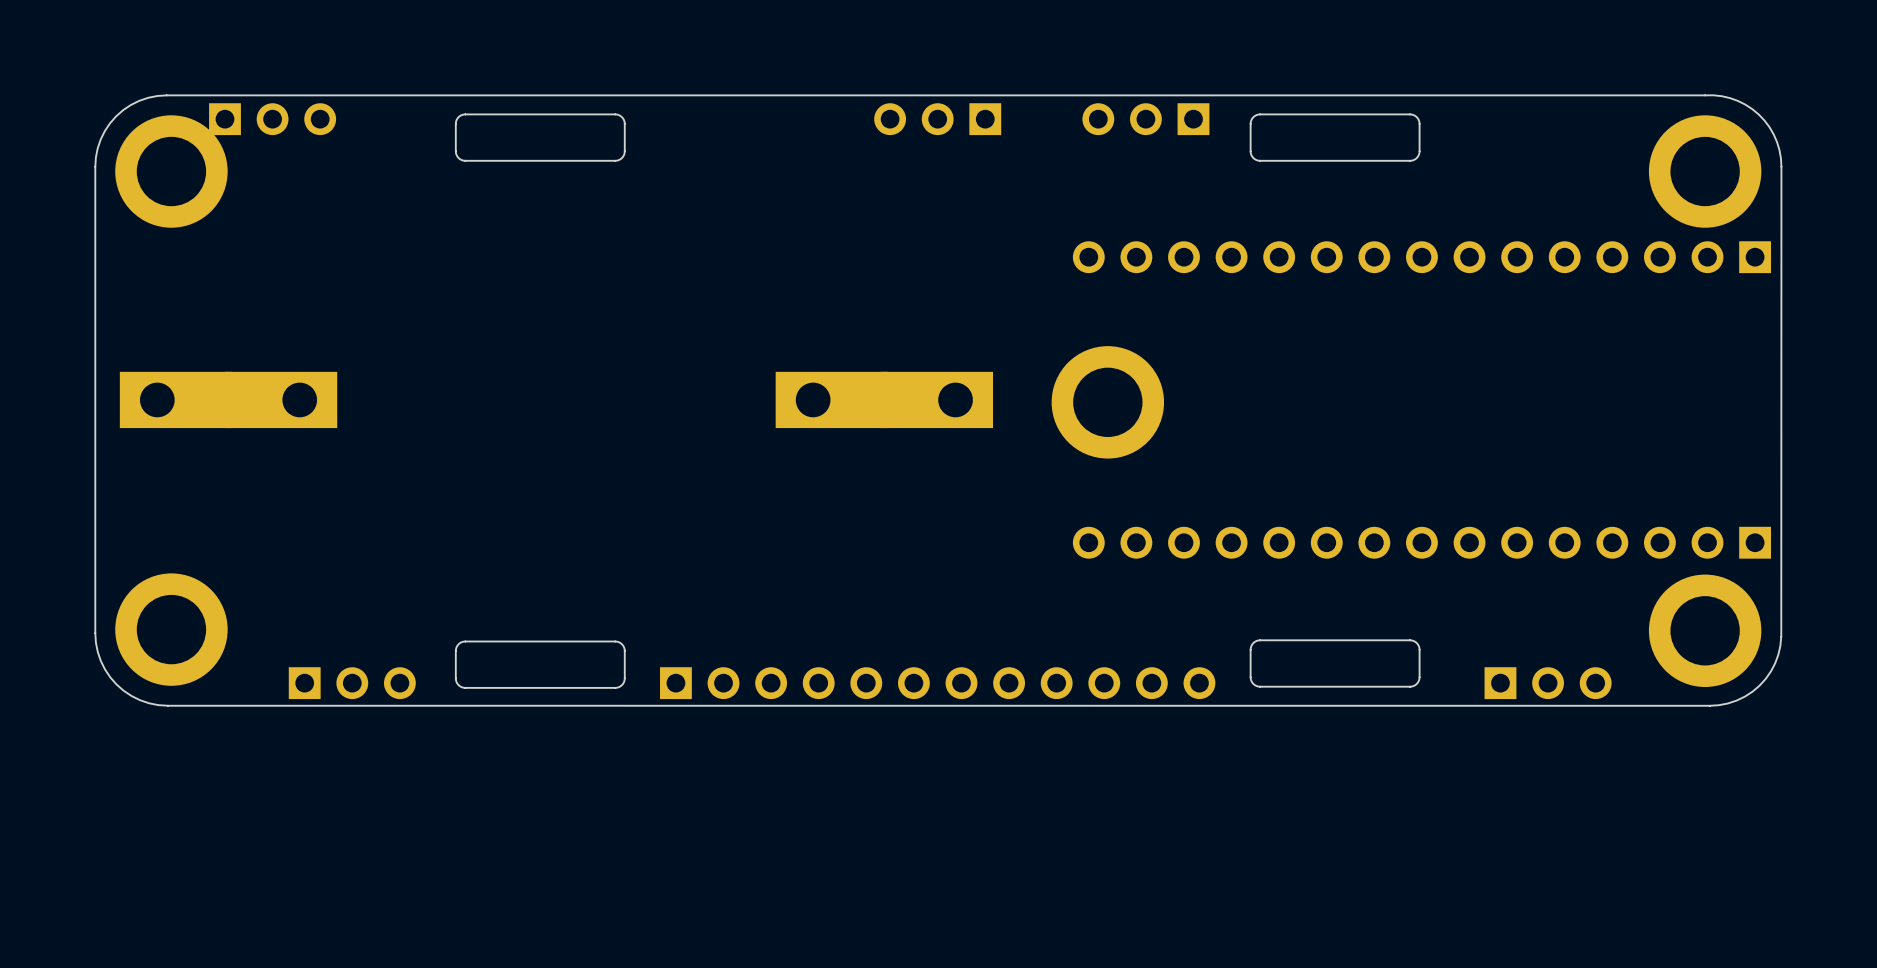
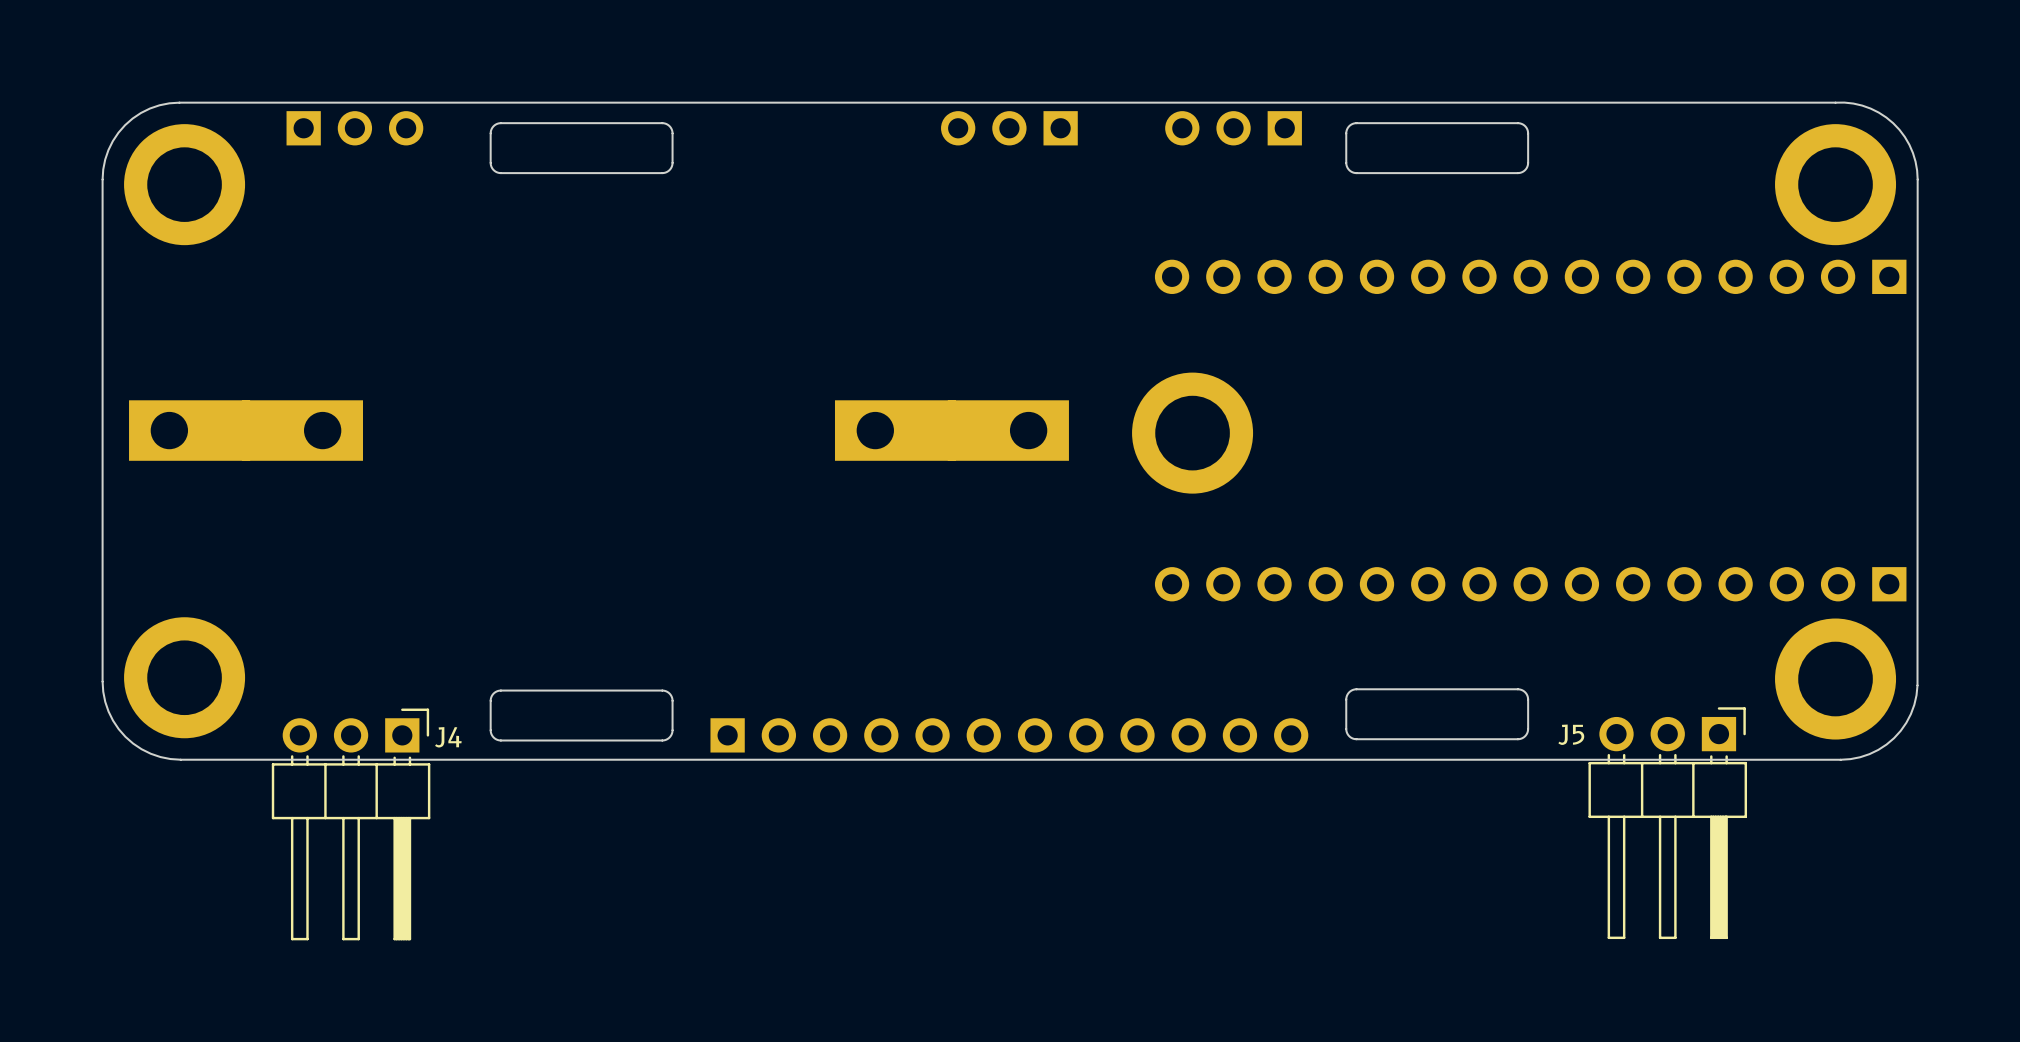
part position: (272, 119) -> (354, 128)
J4 side: top (352, 683) -> bottom (351, 824)
J5 side: top (1548, 683) -> bottom (1667, 823)

